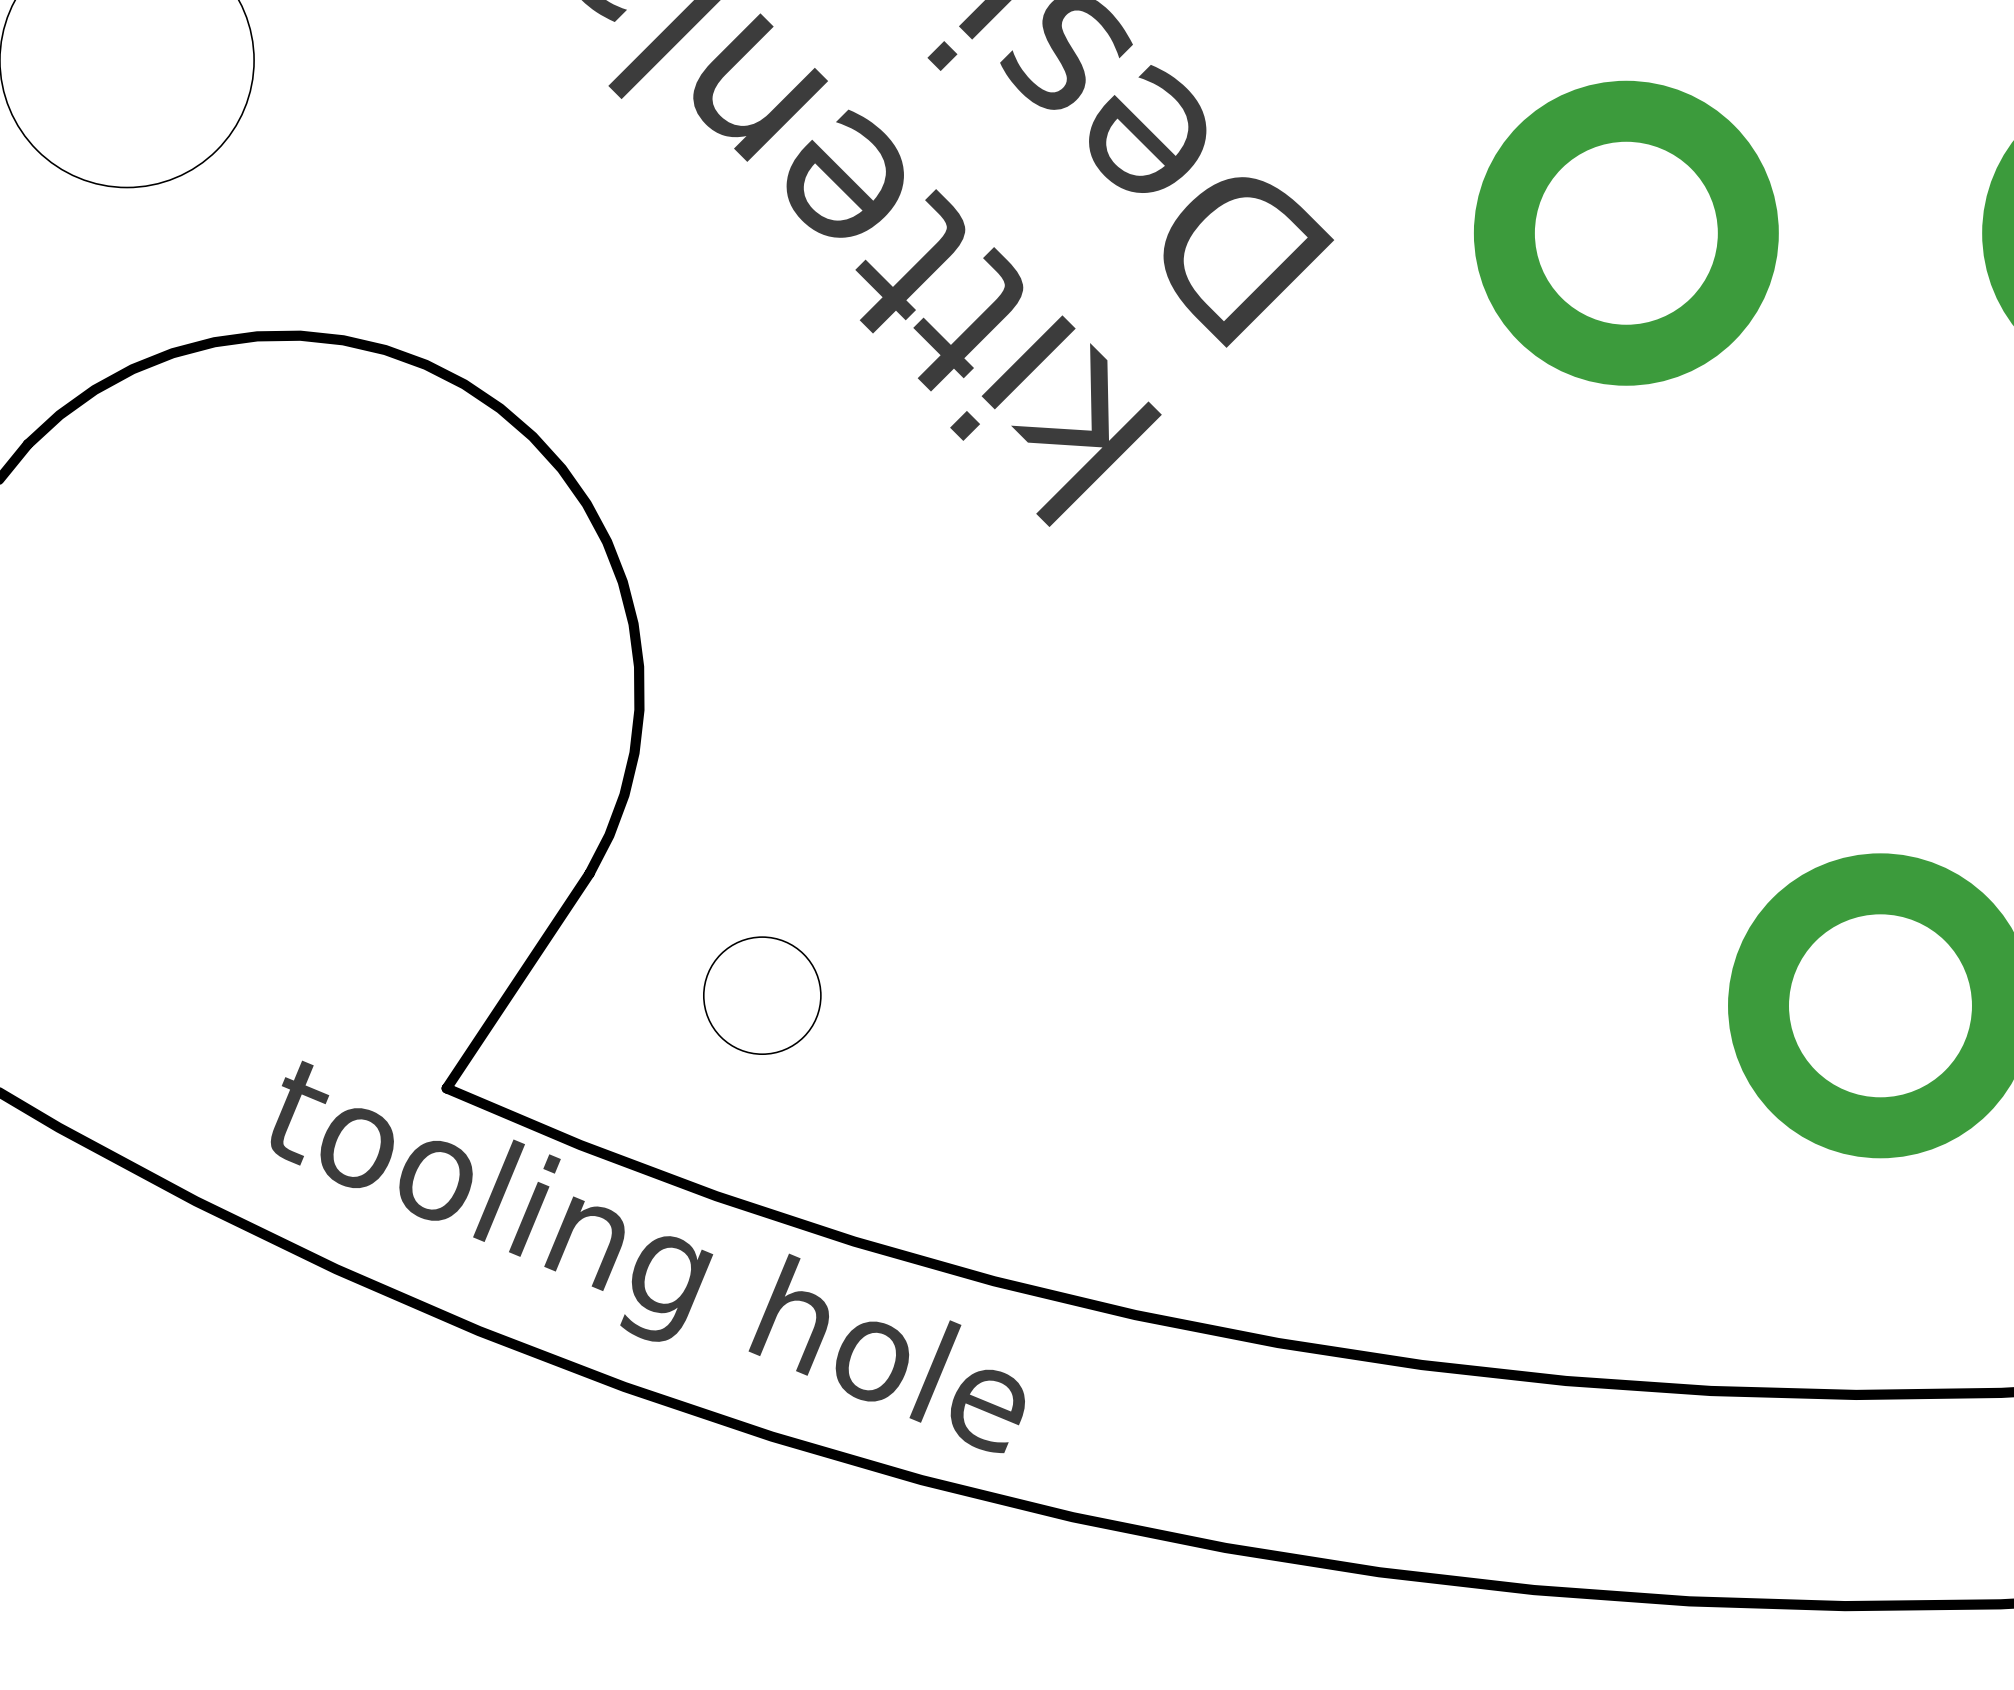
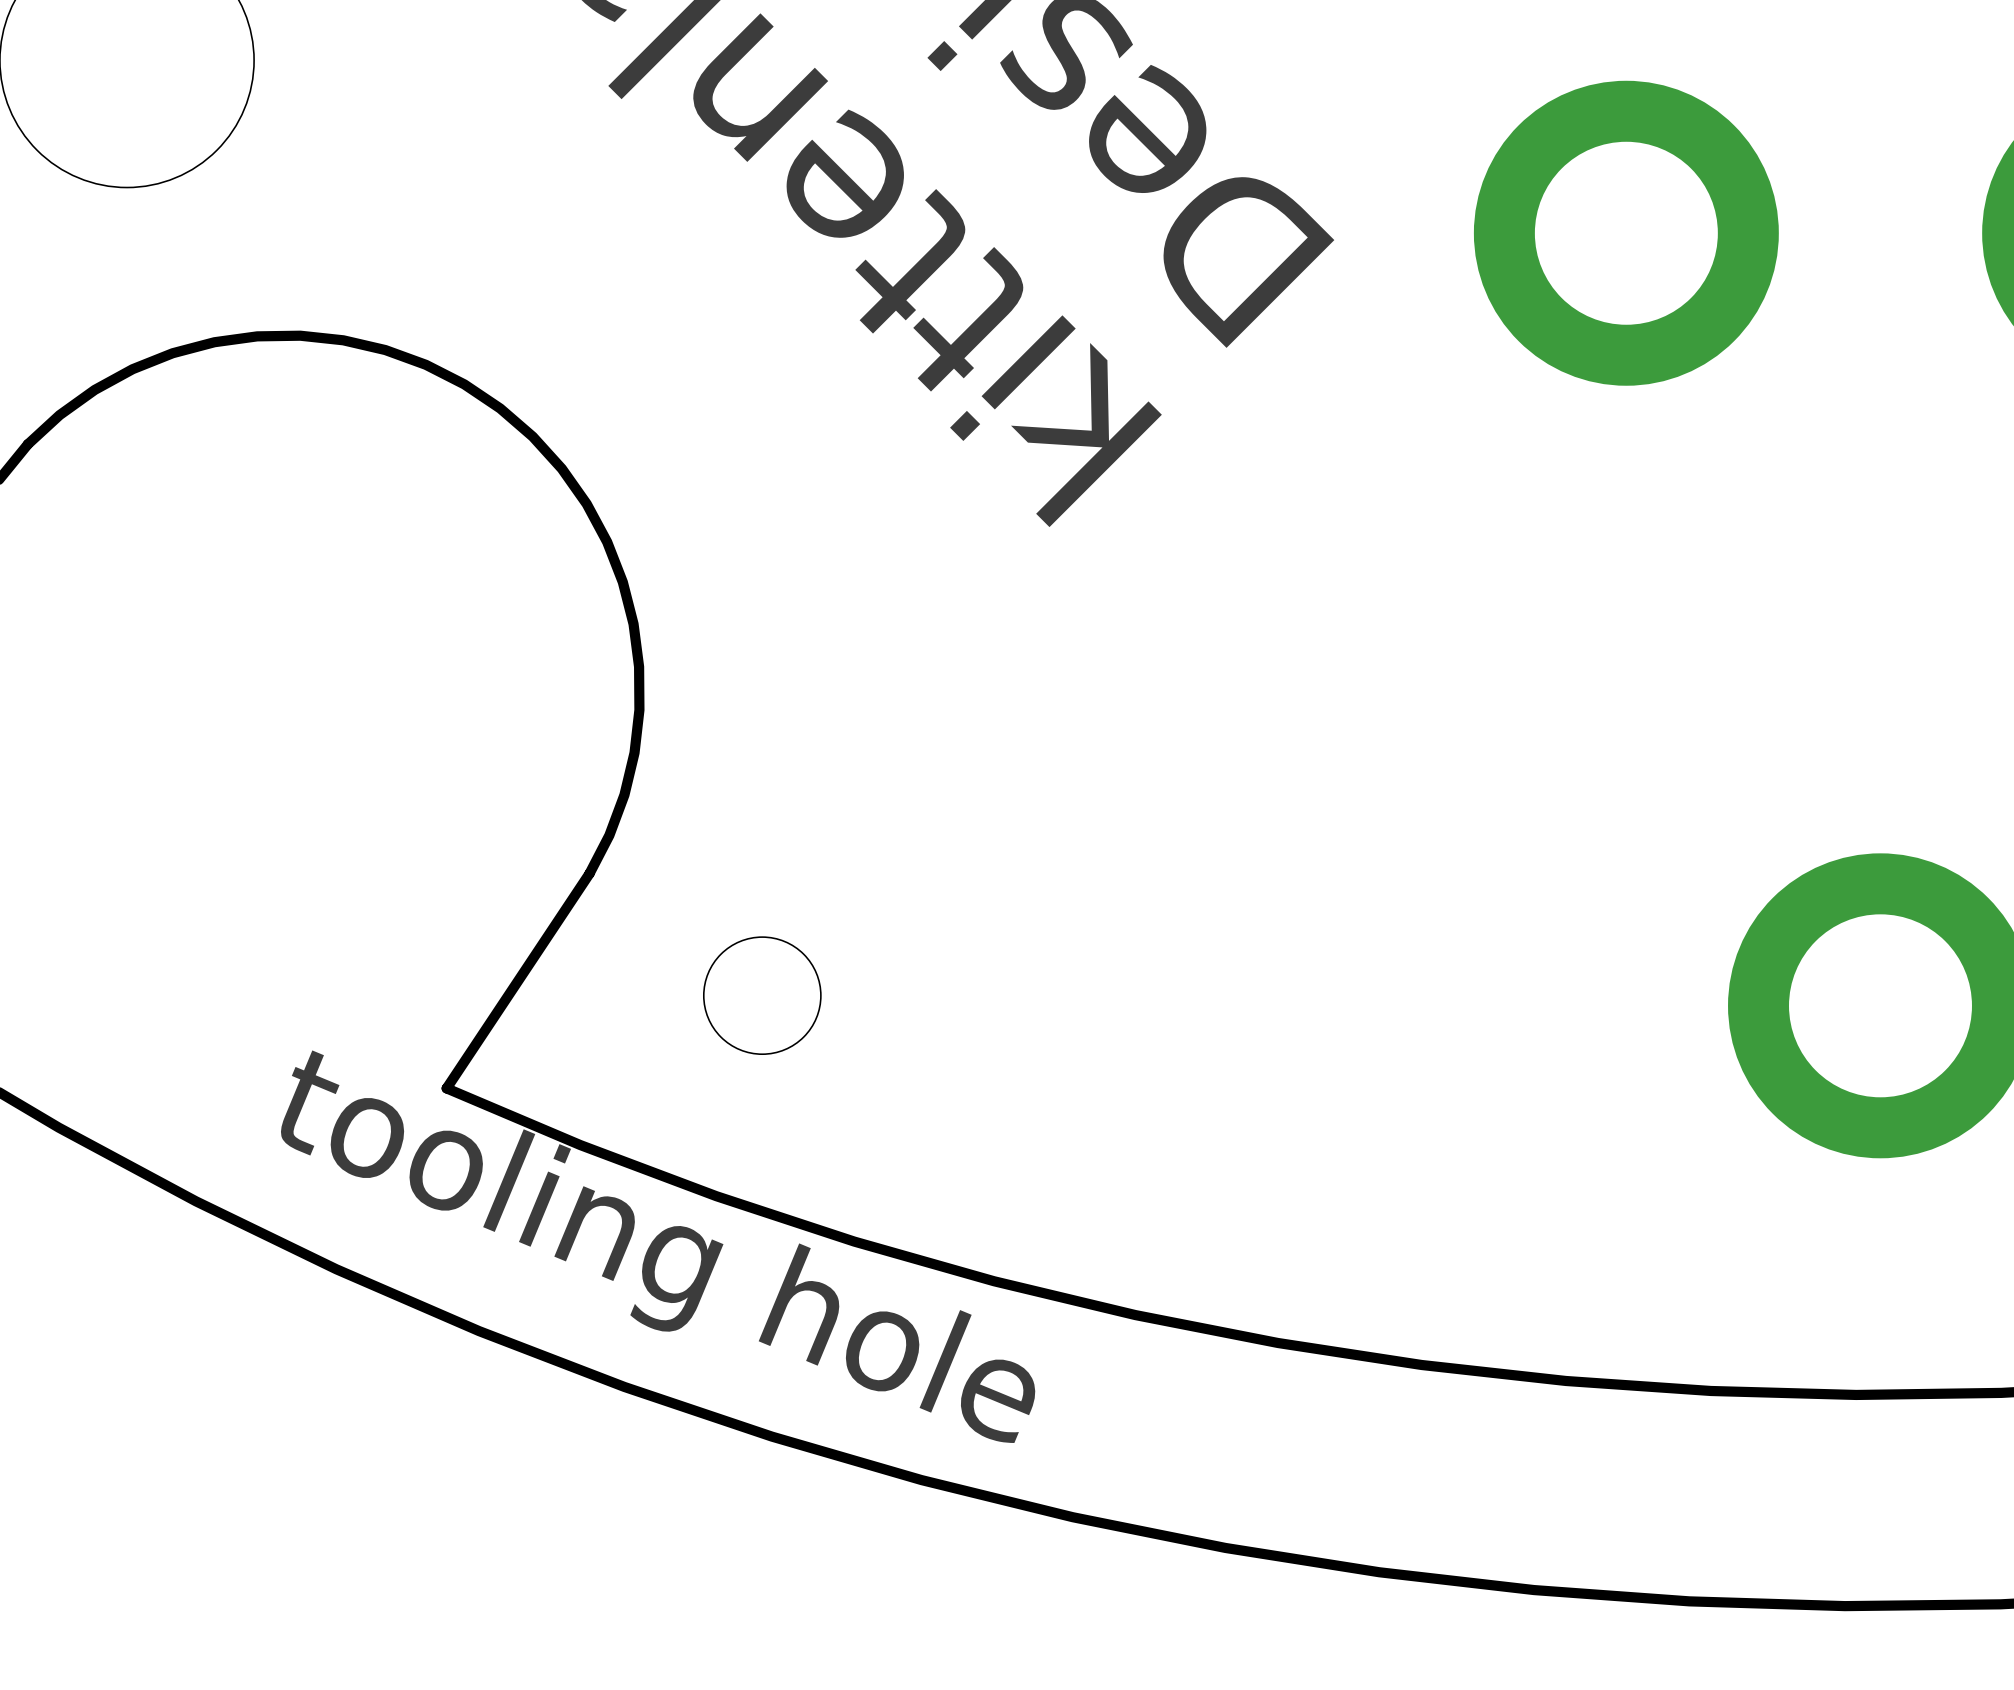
part text position: tooling hole (648, 1256) -> tooling hole (658, 1246)

